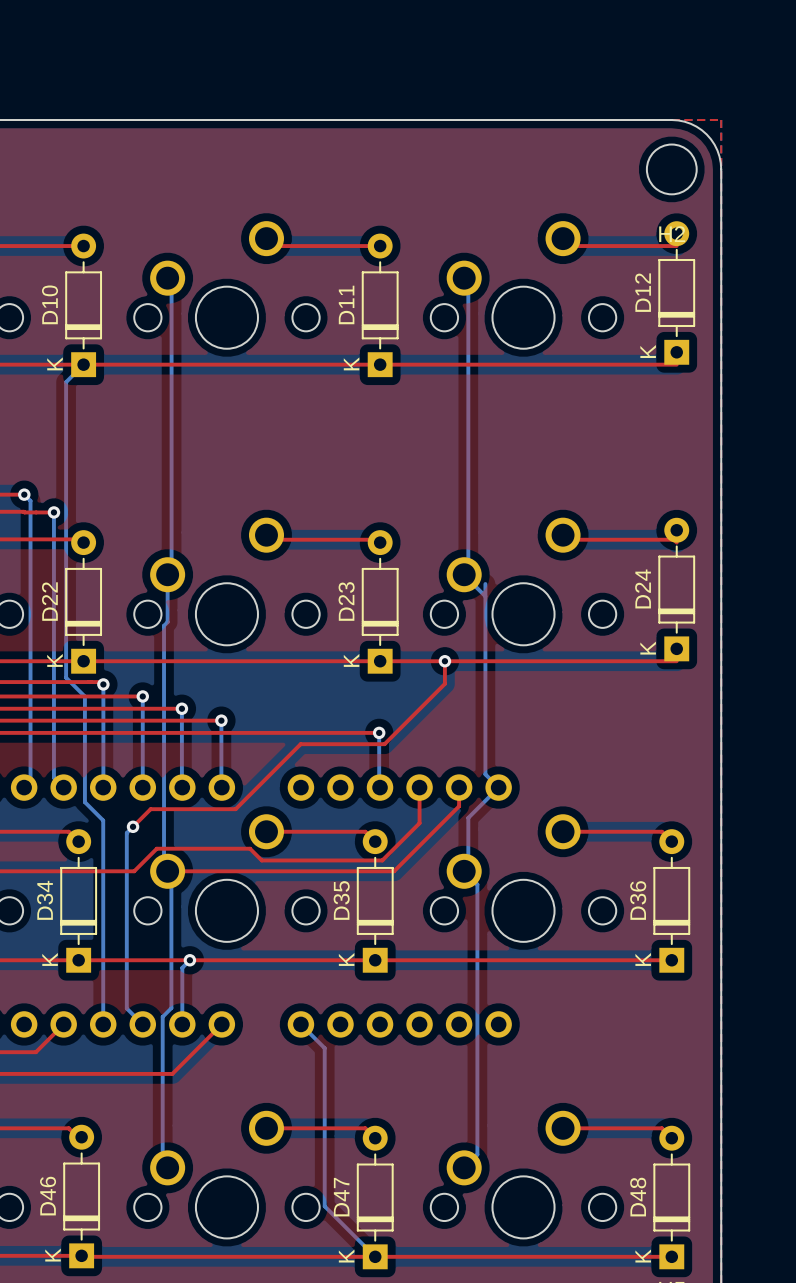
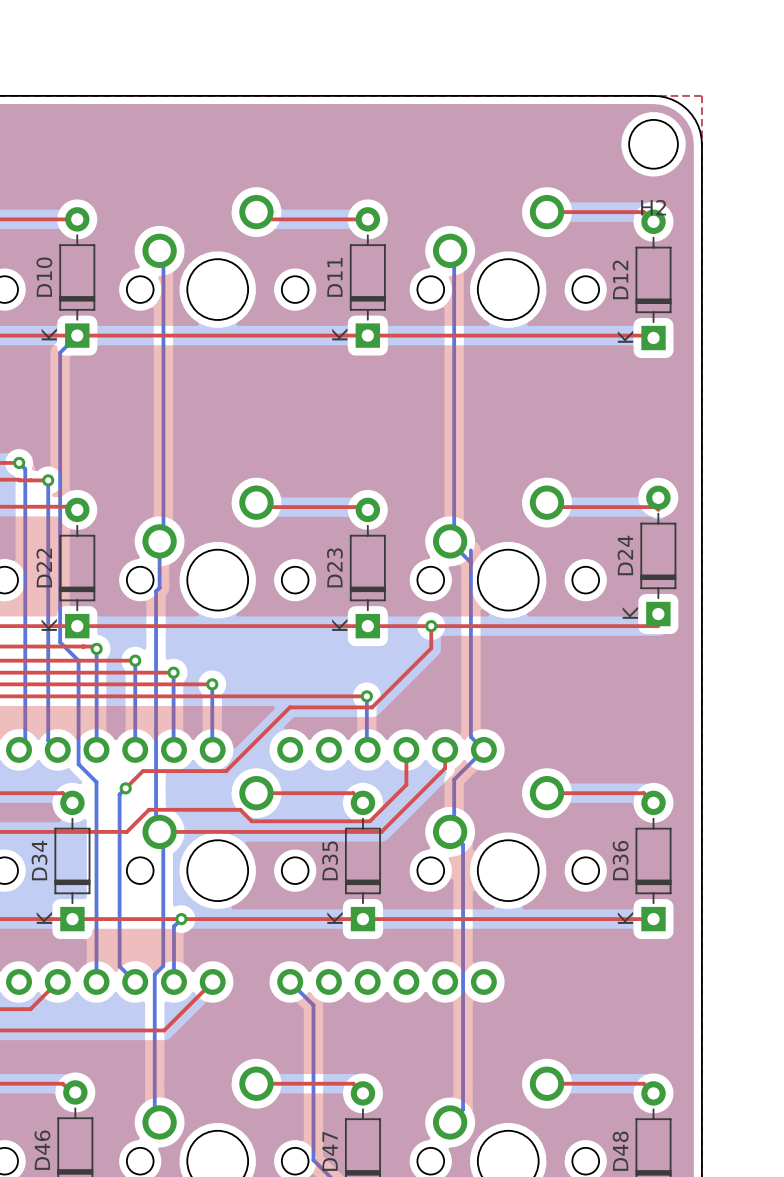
D12 footprint: [658, 221, 696, 365] -> [635, 209, 672, 351]
top track: none -> (546, 212) (643, 212) (653, 221)
top track: (569, 246) (676, 246) -> none

